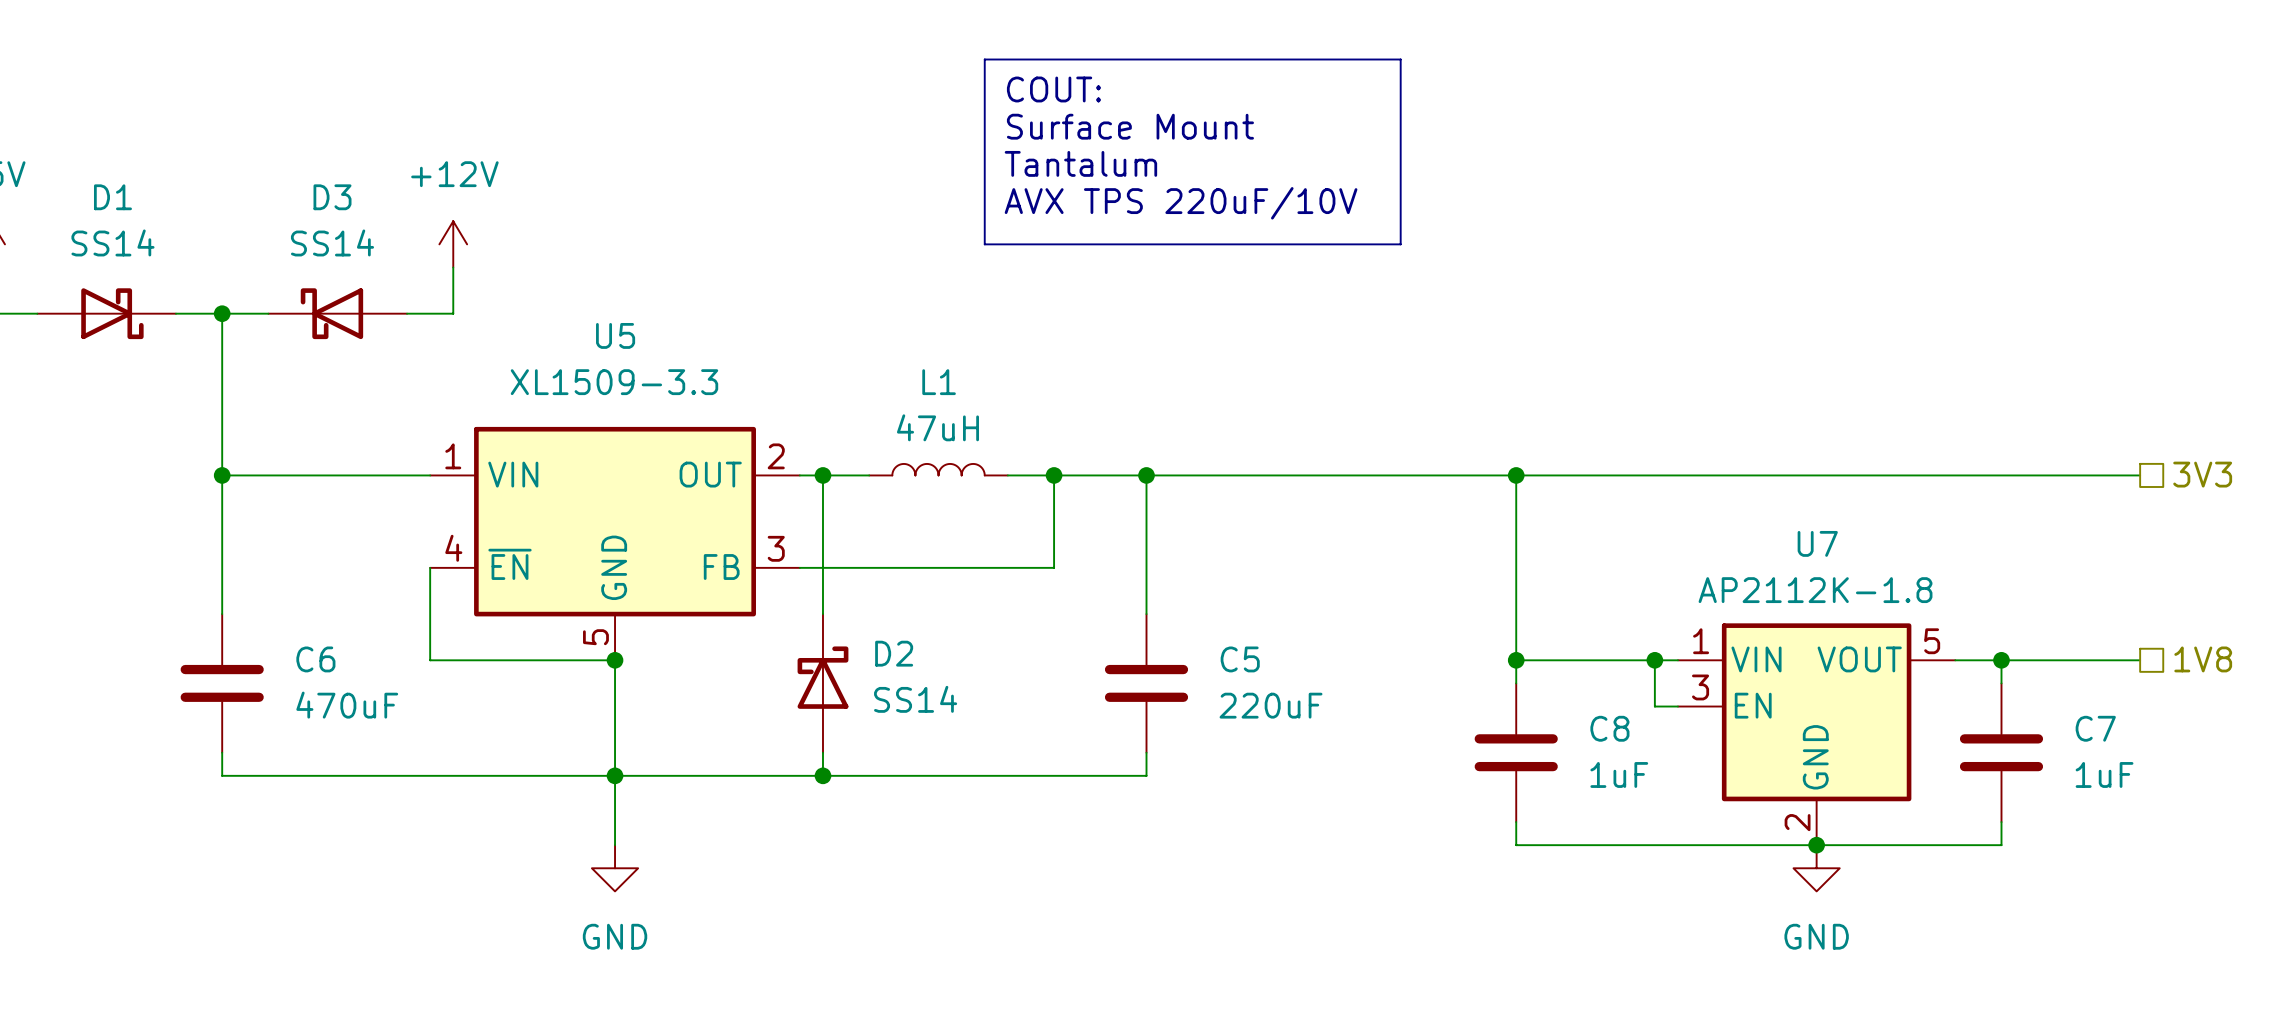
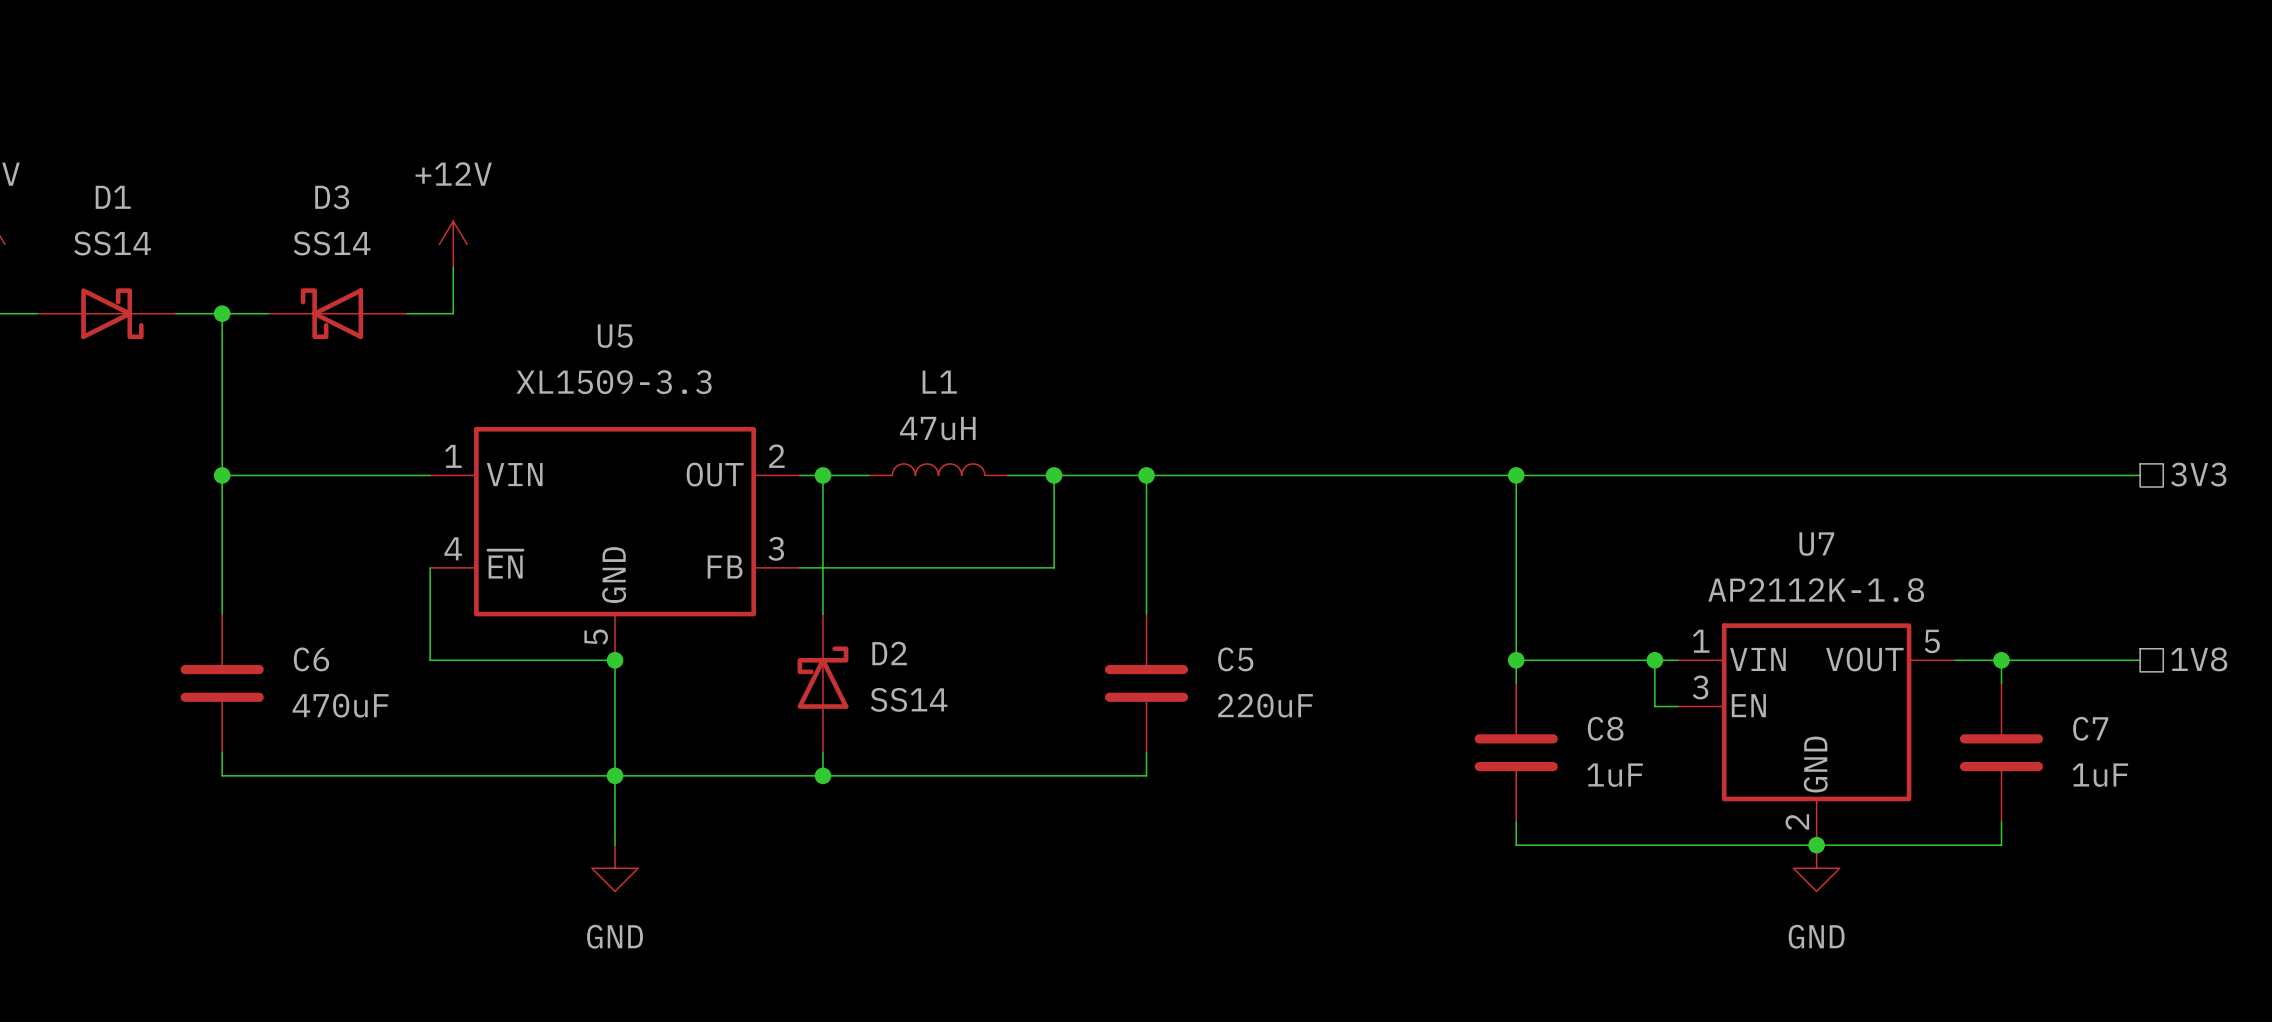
line: (984, 59) (1400, 59) (1400, 244) (984, 244) (984, 59) -> none
text: COUT: (1053, 89) -> none
text: Surface Mount (1130, 126) -> none
text: Tantalum (1080, 163) -> none
text: AVX TPS 220uF/10V (1181, 203) -> none

